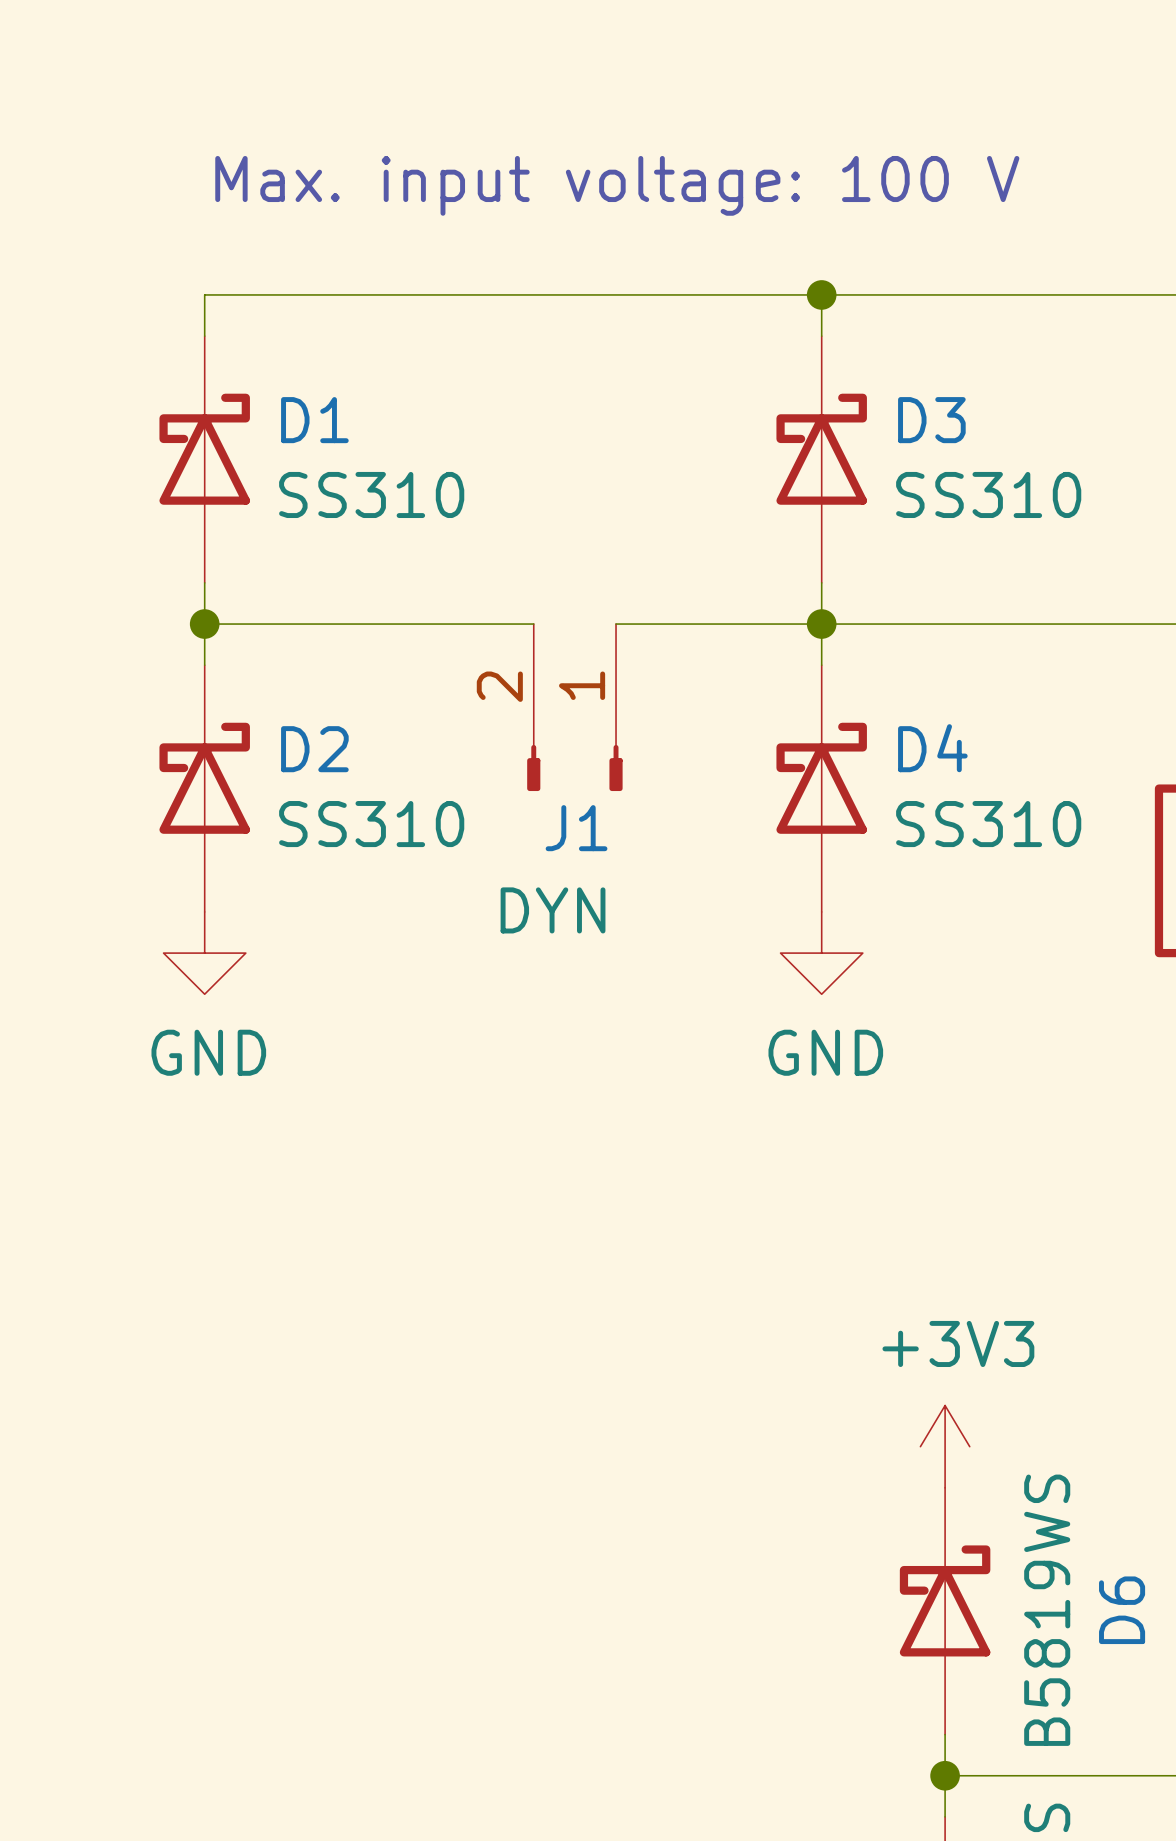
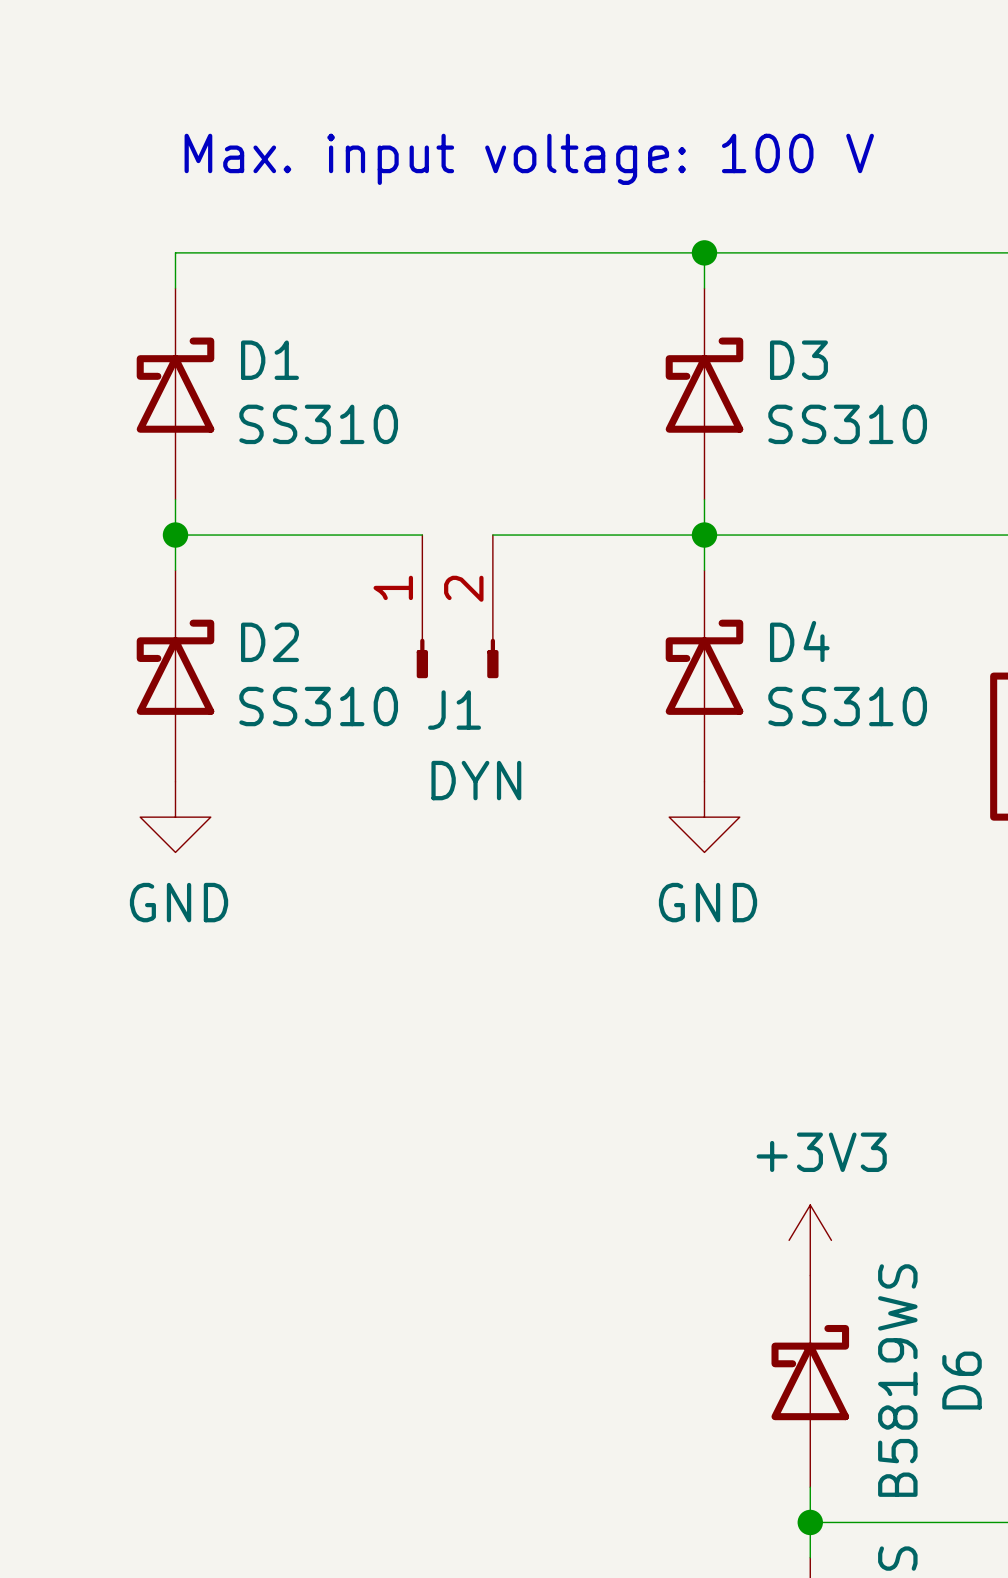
wire: (492, 624) (533, 624) -> (492, 535) (528, 535)
J1 flip: as is (574, 768) -> left-right (457, 658)

